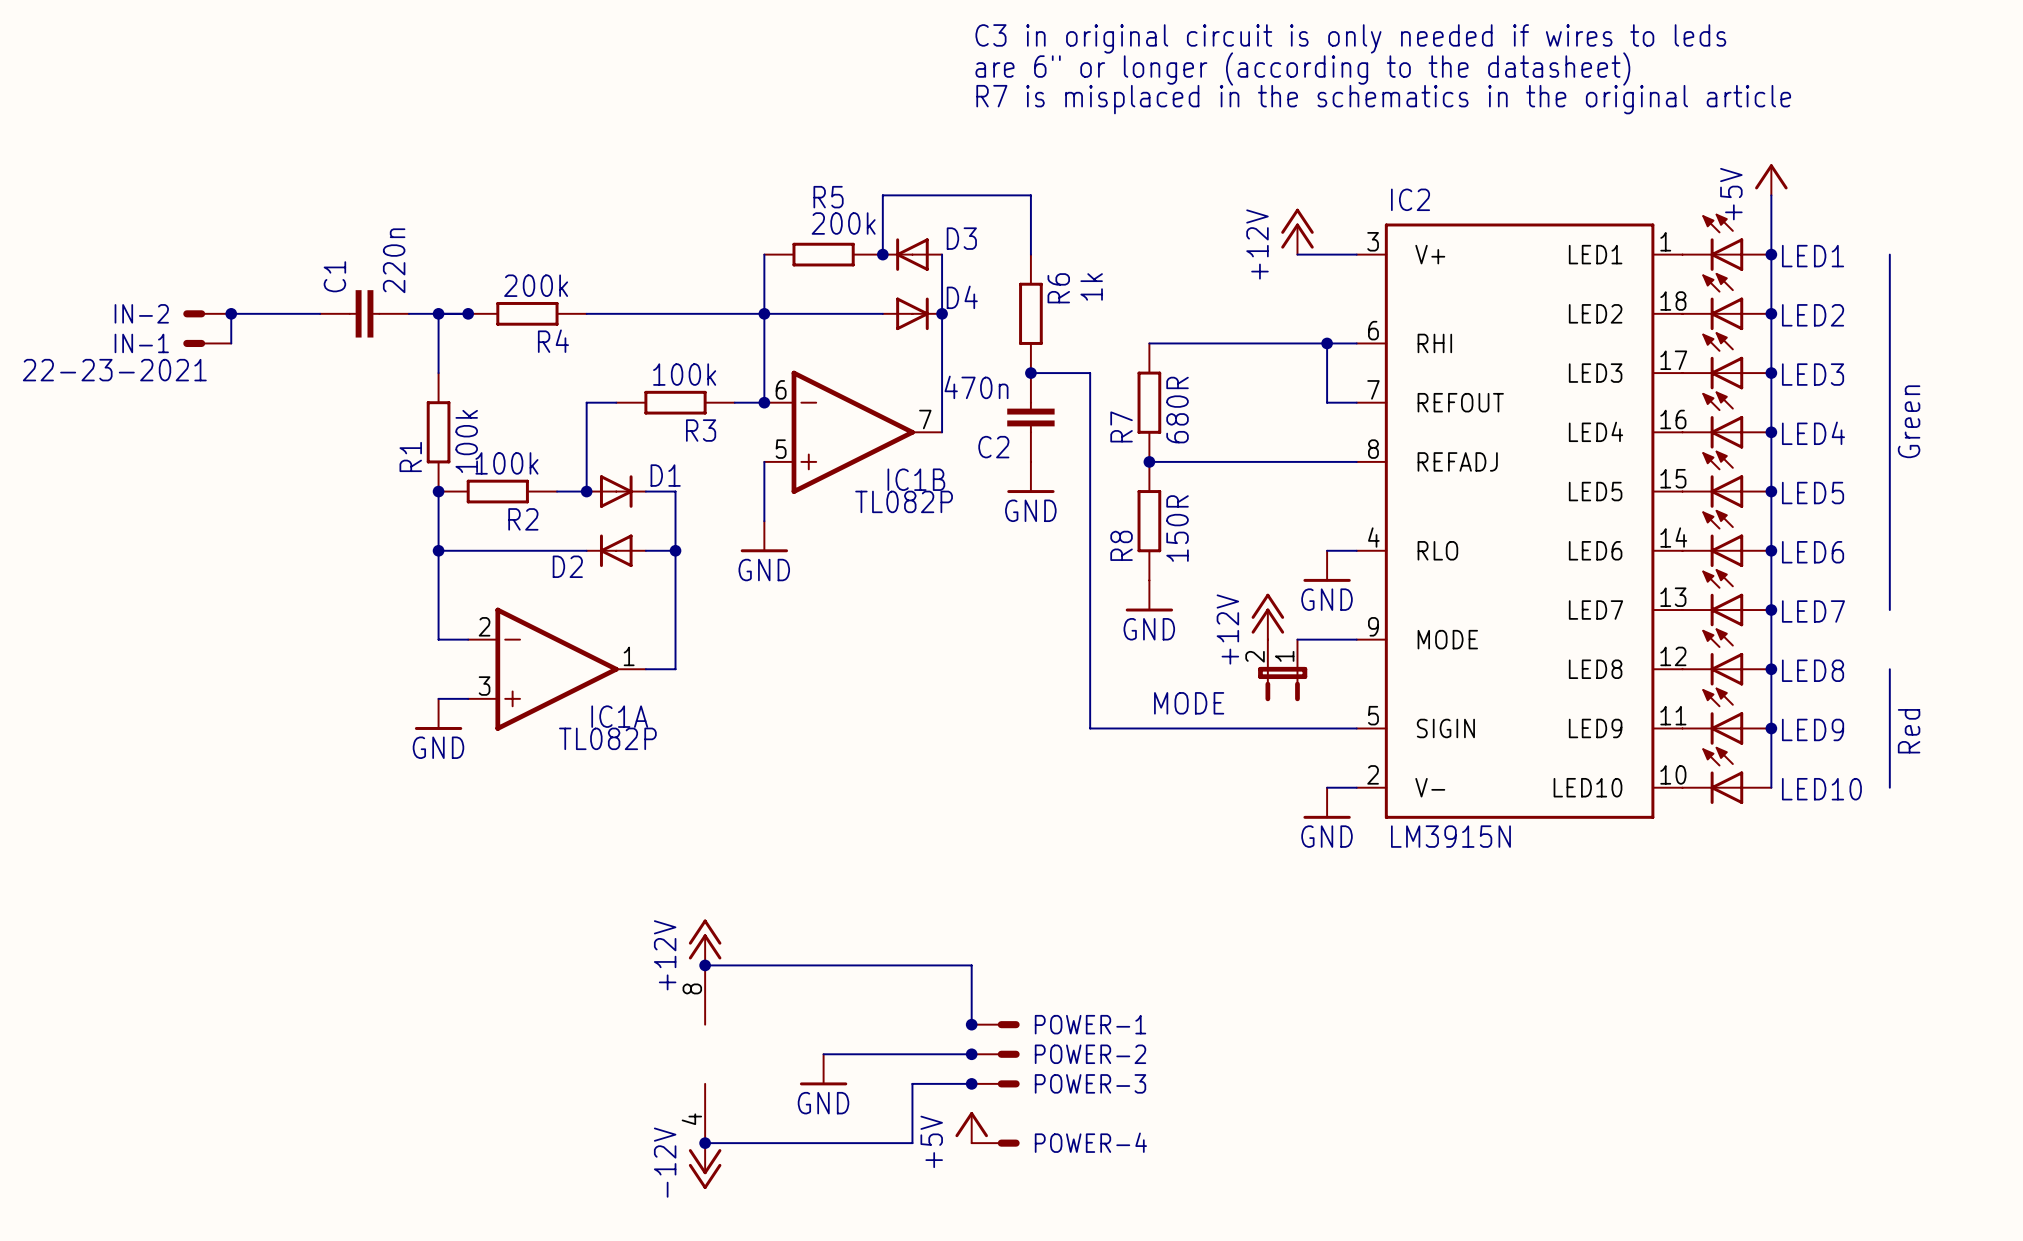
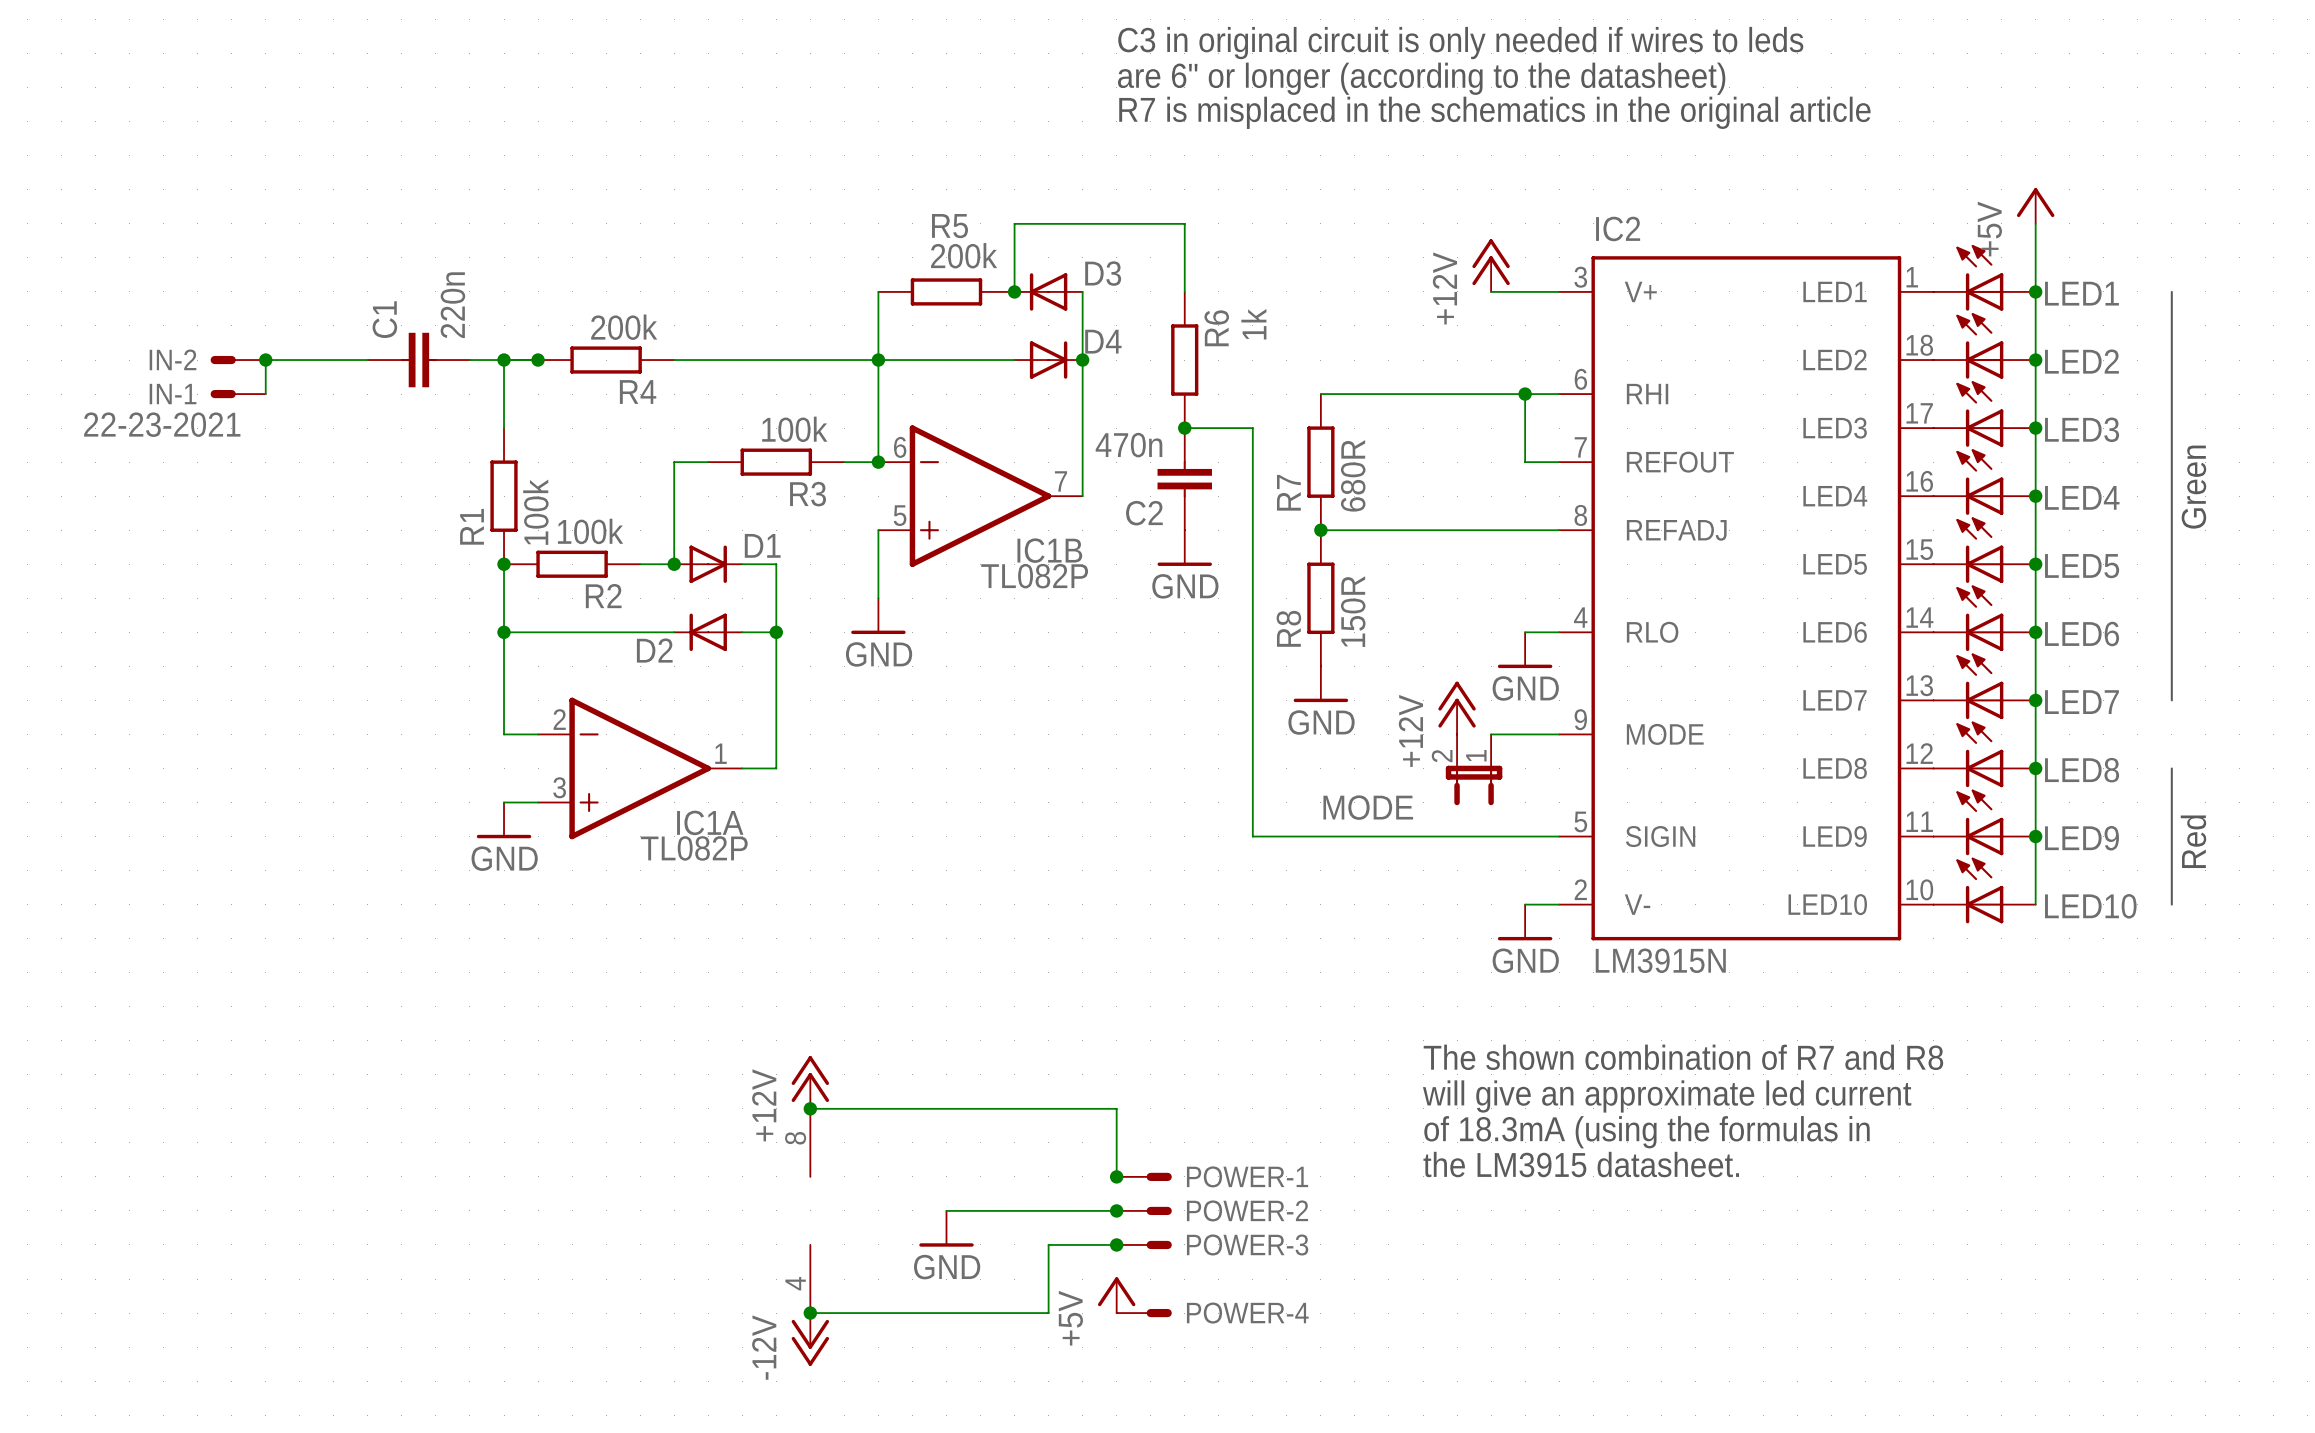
text: none -> The shown combination of R7 and R8 (1683, 1057)
text: none -> will give an approximate led current (1667, 1096)
text: none -> of 18.3mA (using the formulas in (1647, 1132)
text: none -> the LM3915 datasheet. (1581, 1164)

